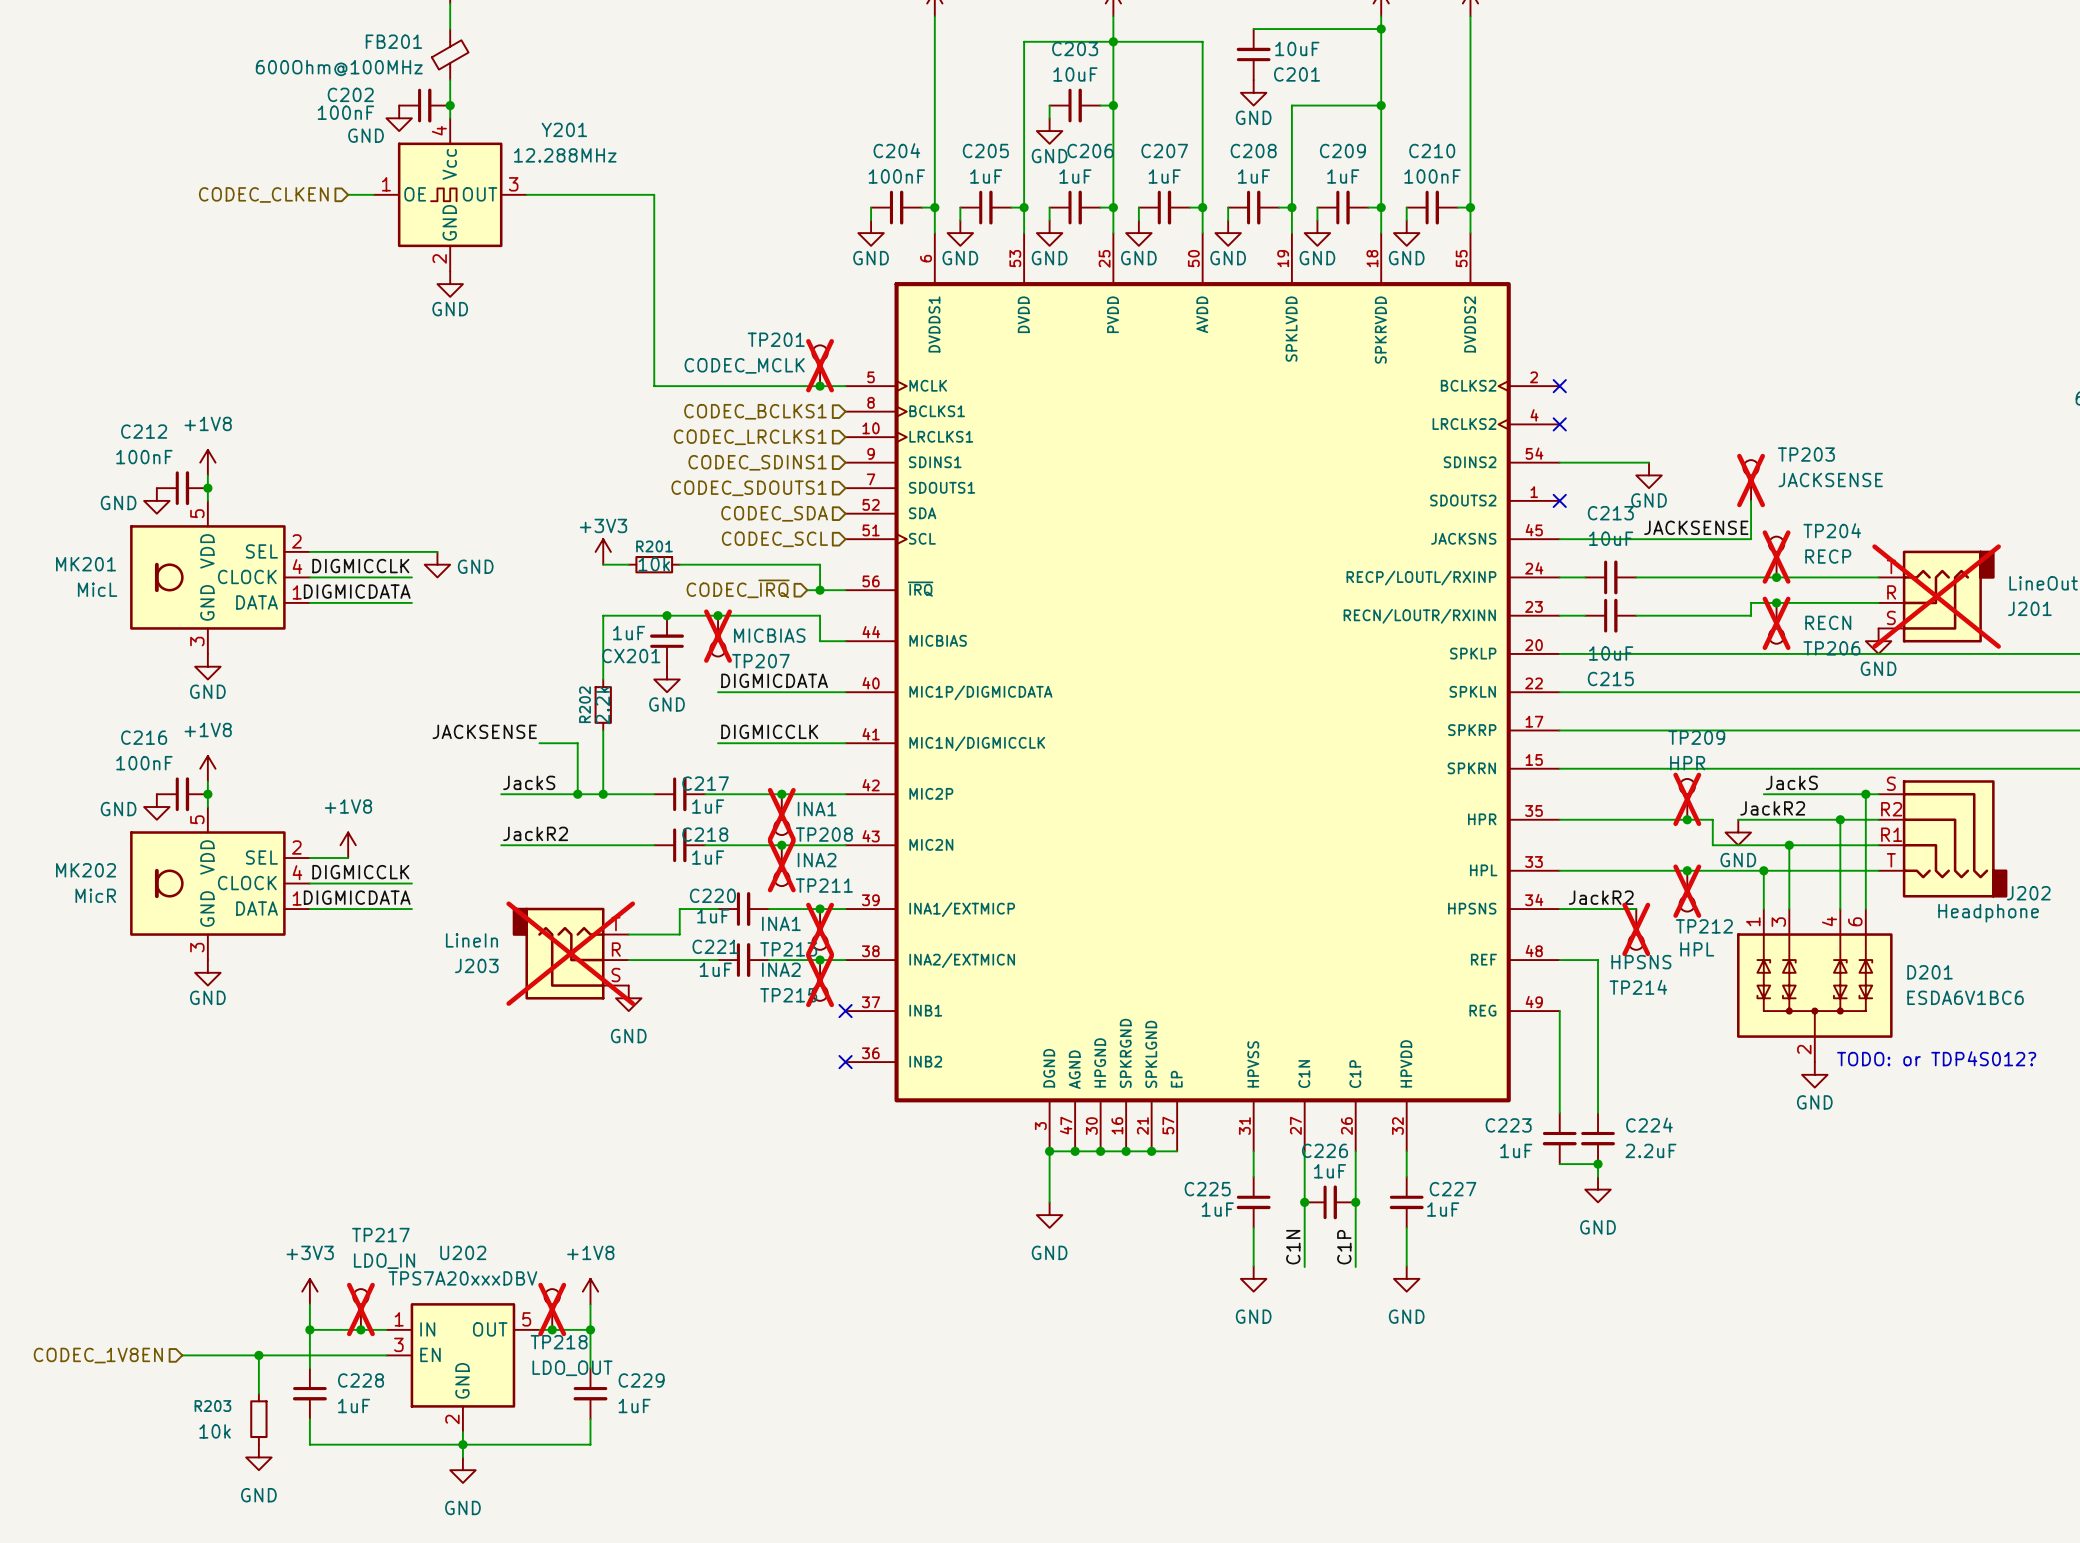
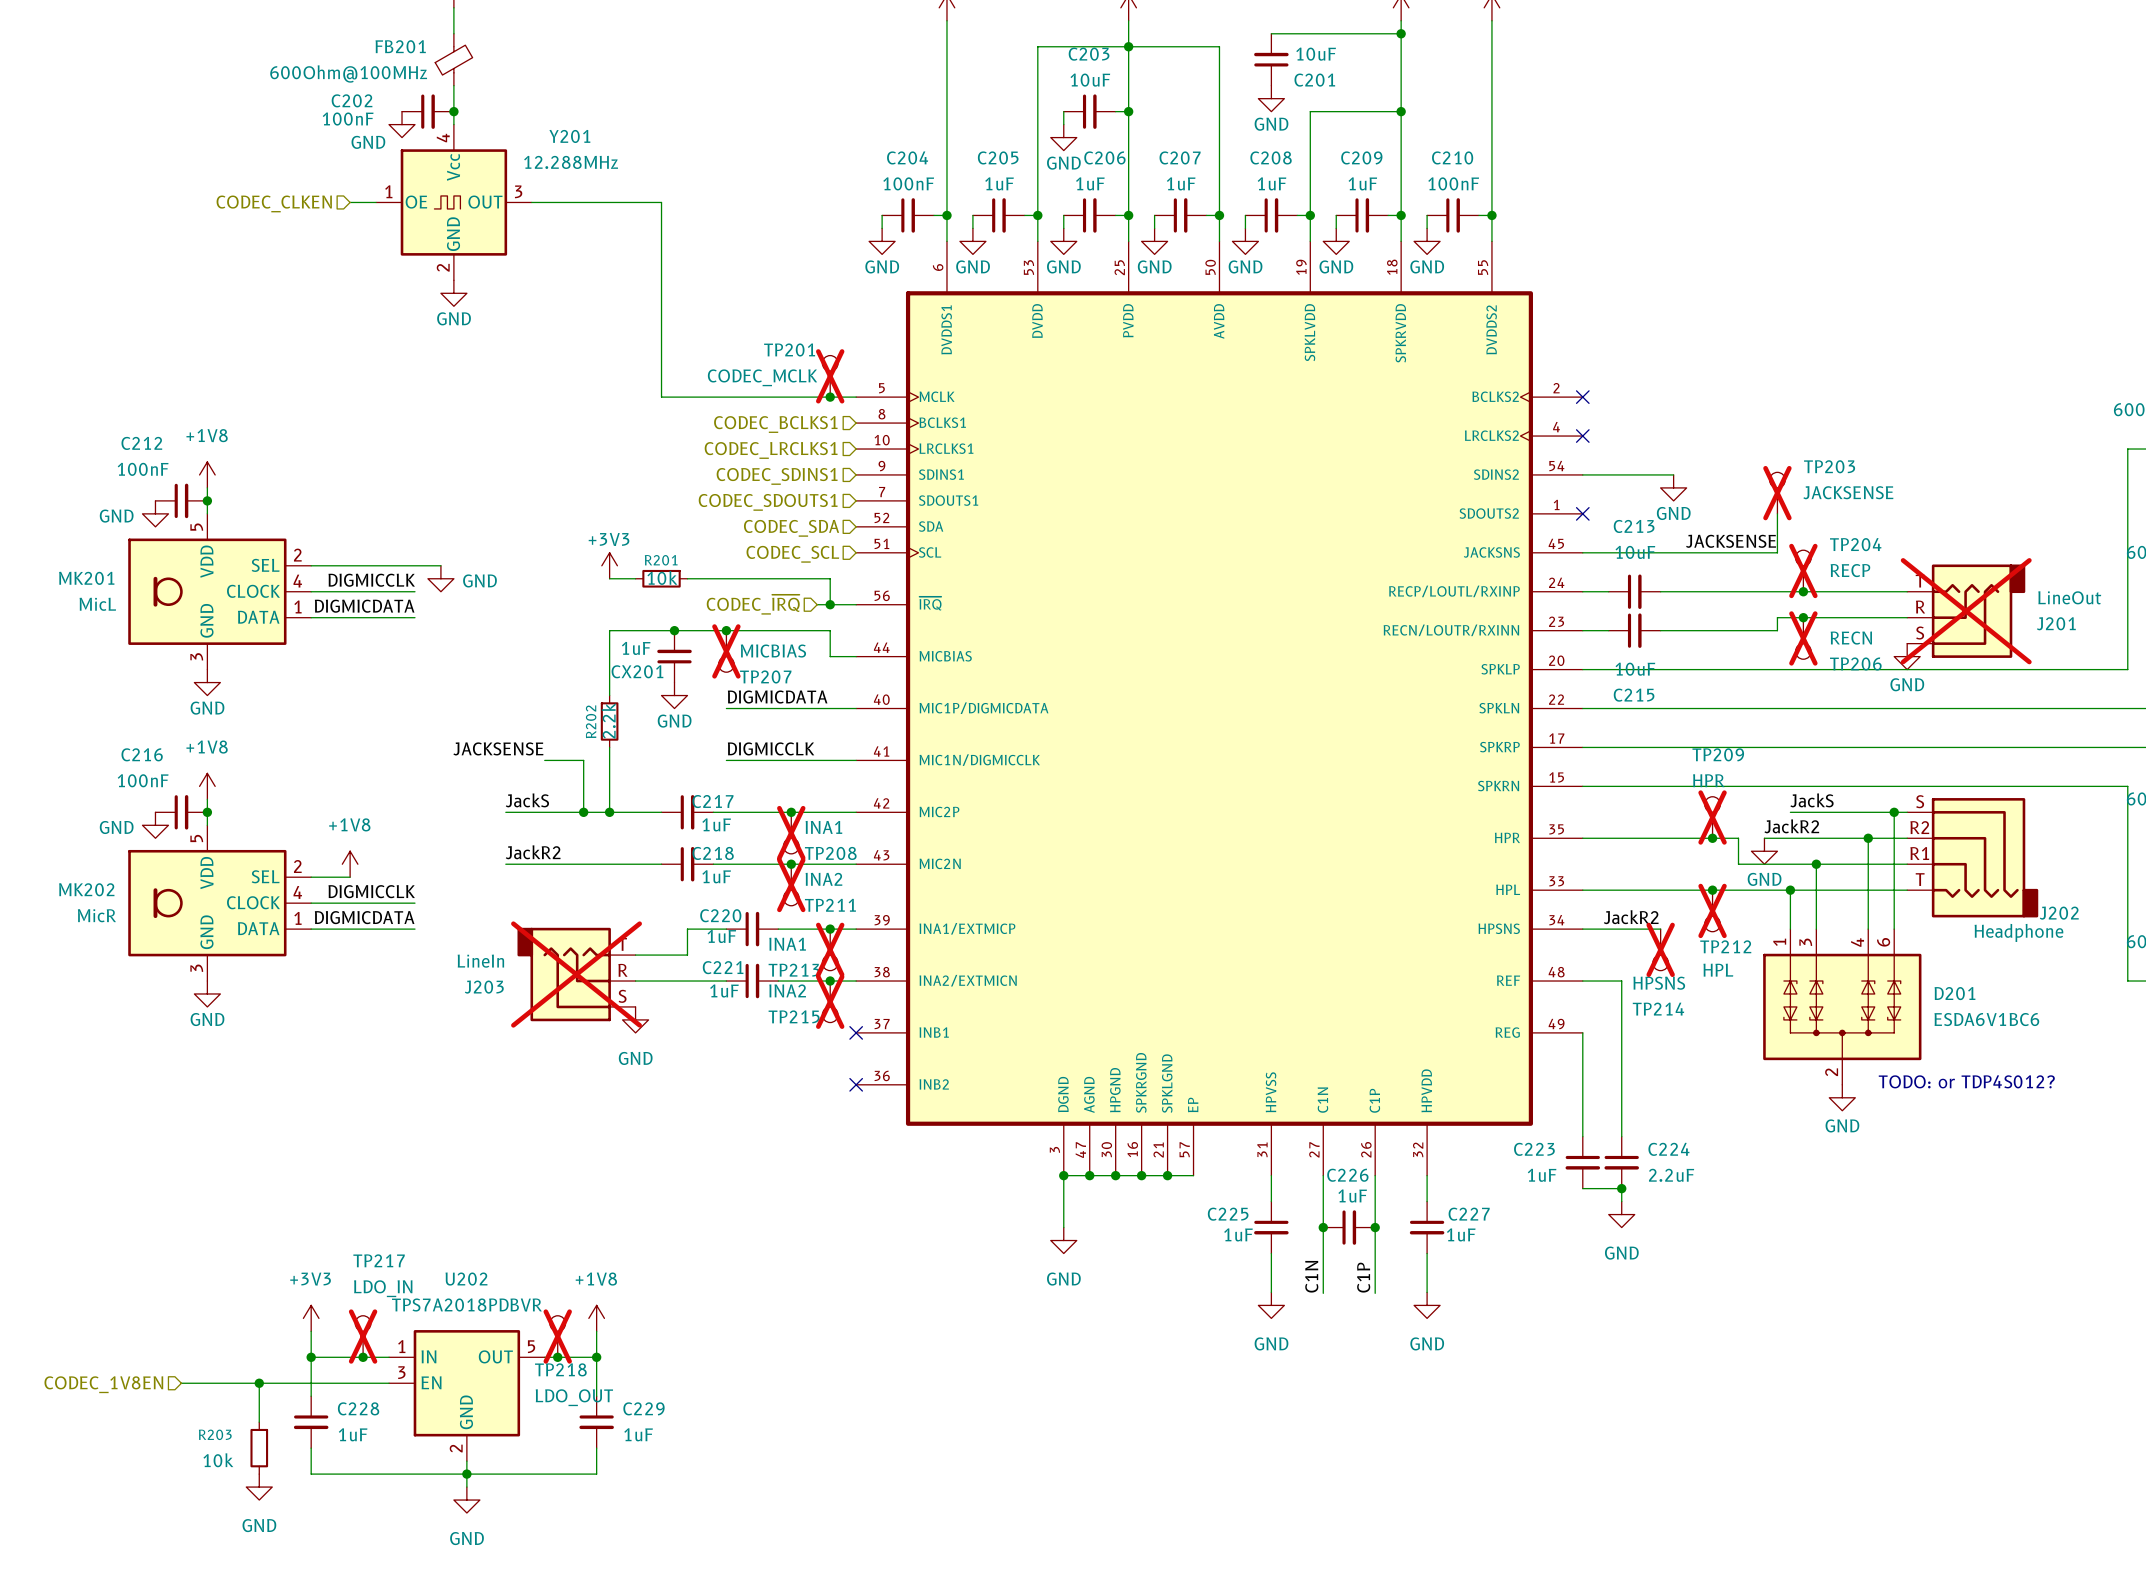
U202 value: TPS7A20xxxDBV (462, 1278) -> TPS7A2018PDBVR (466, 1305)

